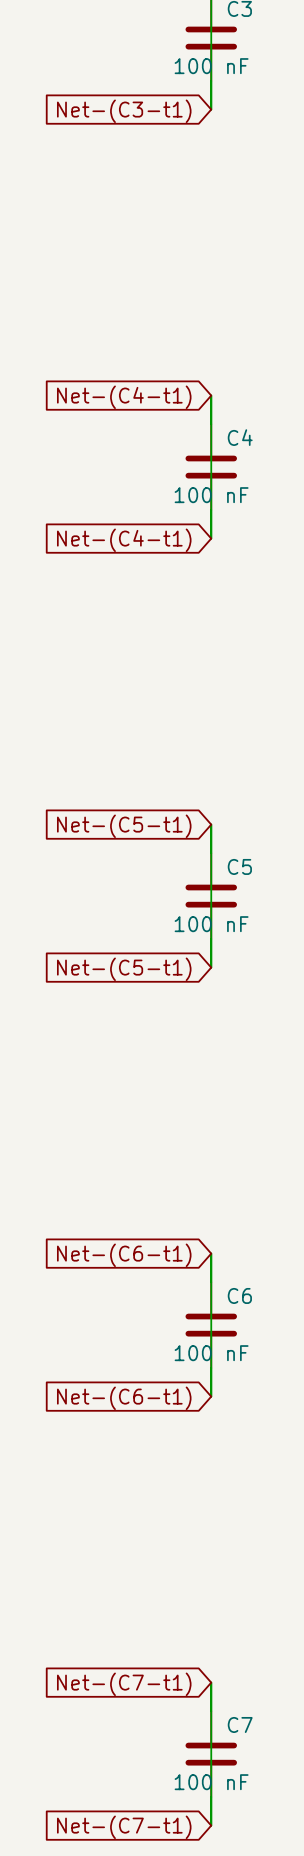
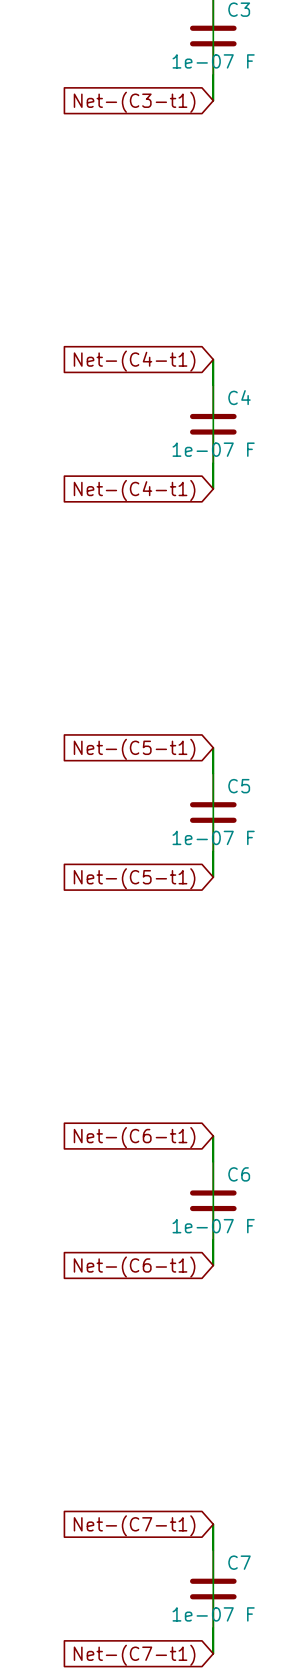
C3 value: 100 nF (211, 66) -> 1e-07 F (213, 61)
C4 value: 100 nF (211, 495) -> 1e-07 F (213, 449)
C5 value: 100 nF (211, 924) -> 1e-07 F (213, 837)
C6 value: 100 nF (211, 1353) -> 1e-07 F (213, 1226)
C7 value: 100 nF (211, 1782) -> 1e-07 F (213, 1614)

